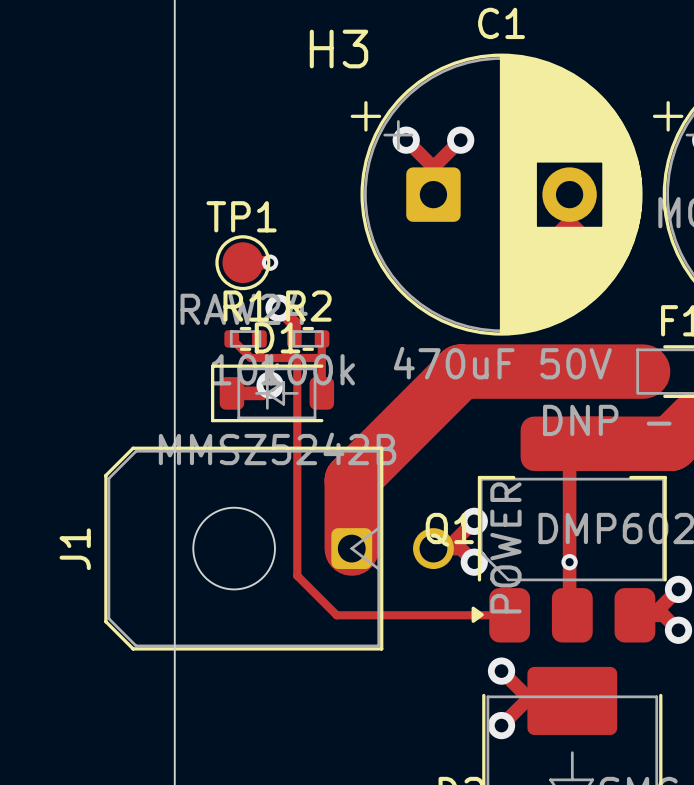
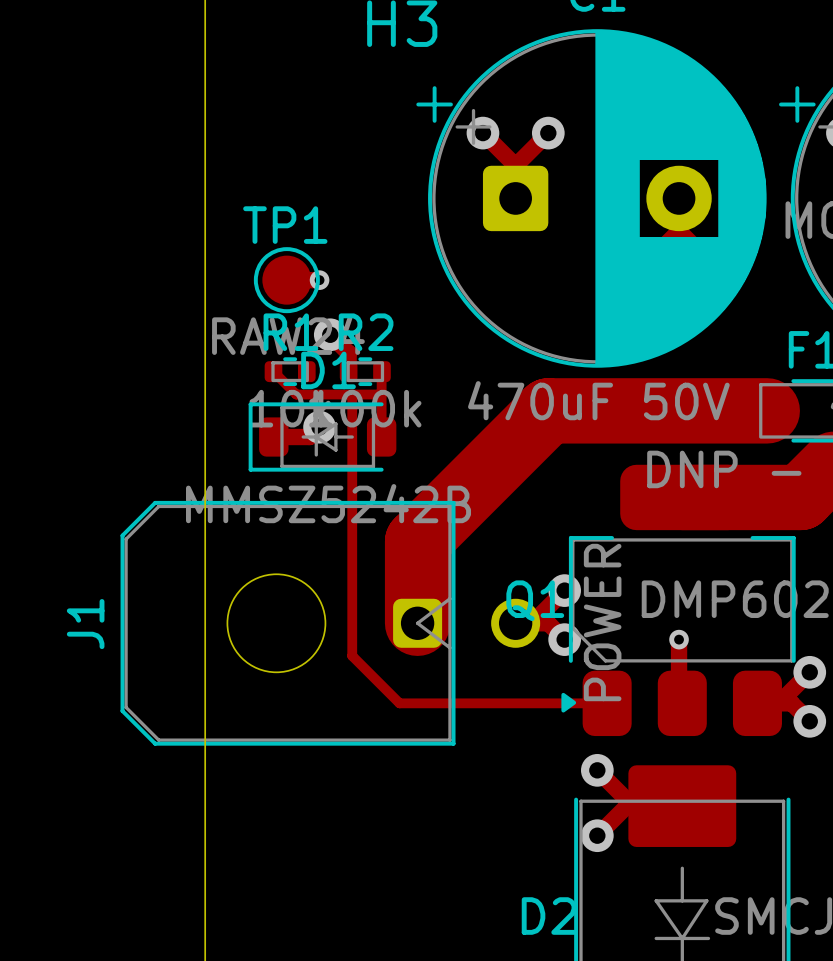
track: (572, 443) (569, 446) (569, 562) -> none

